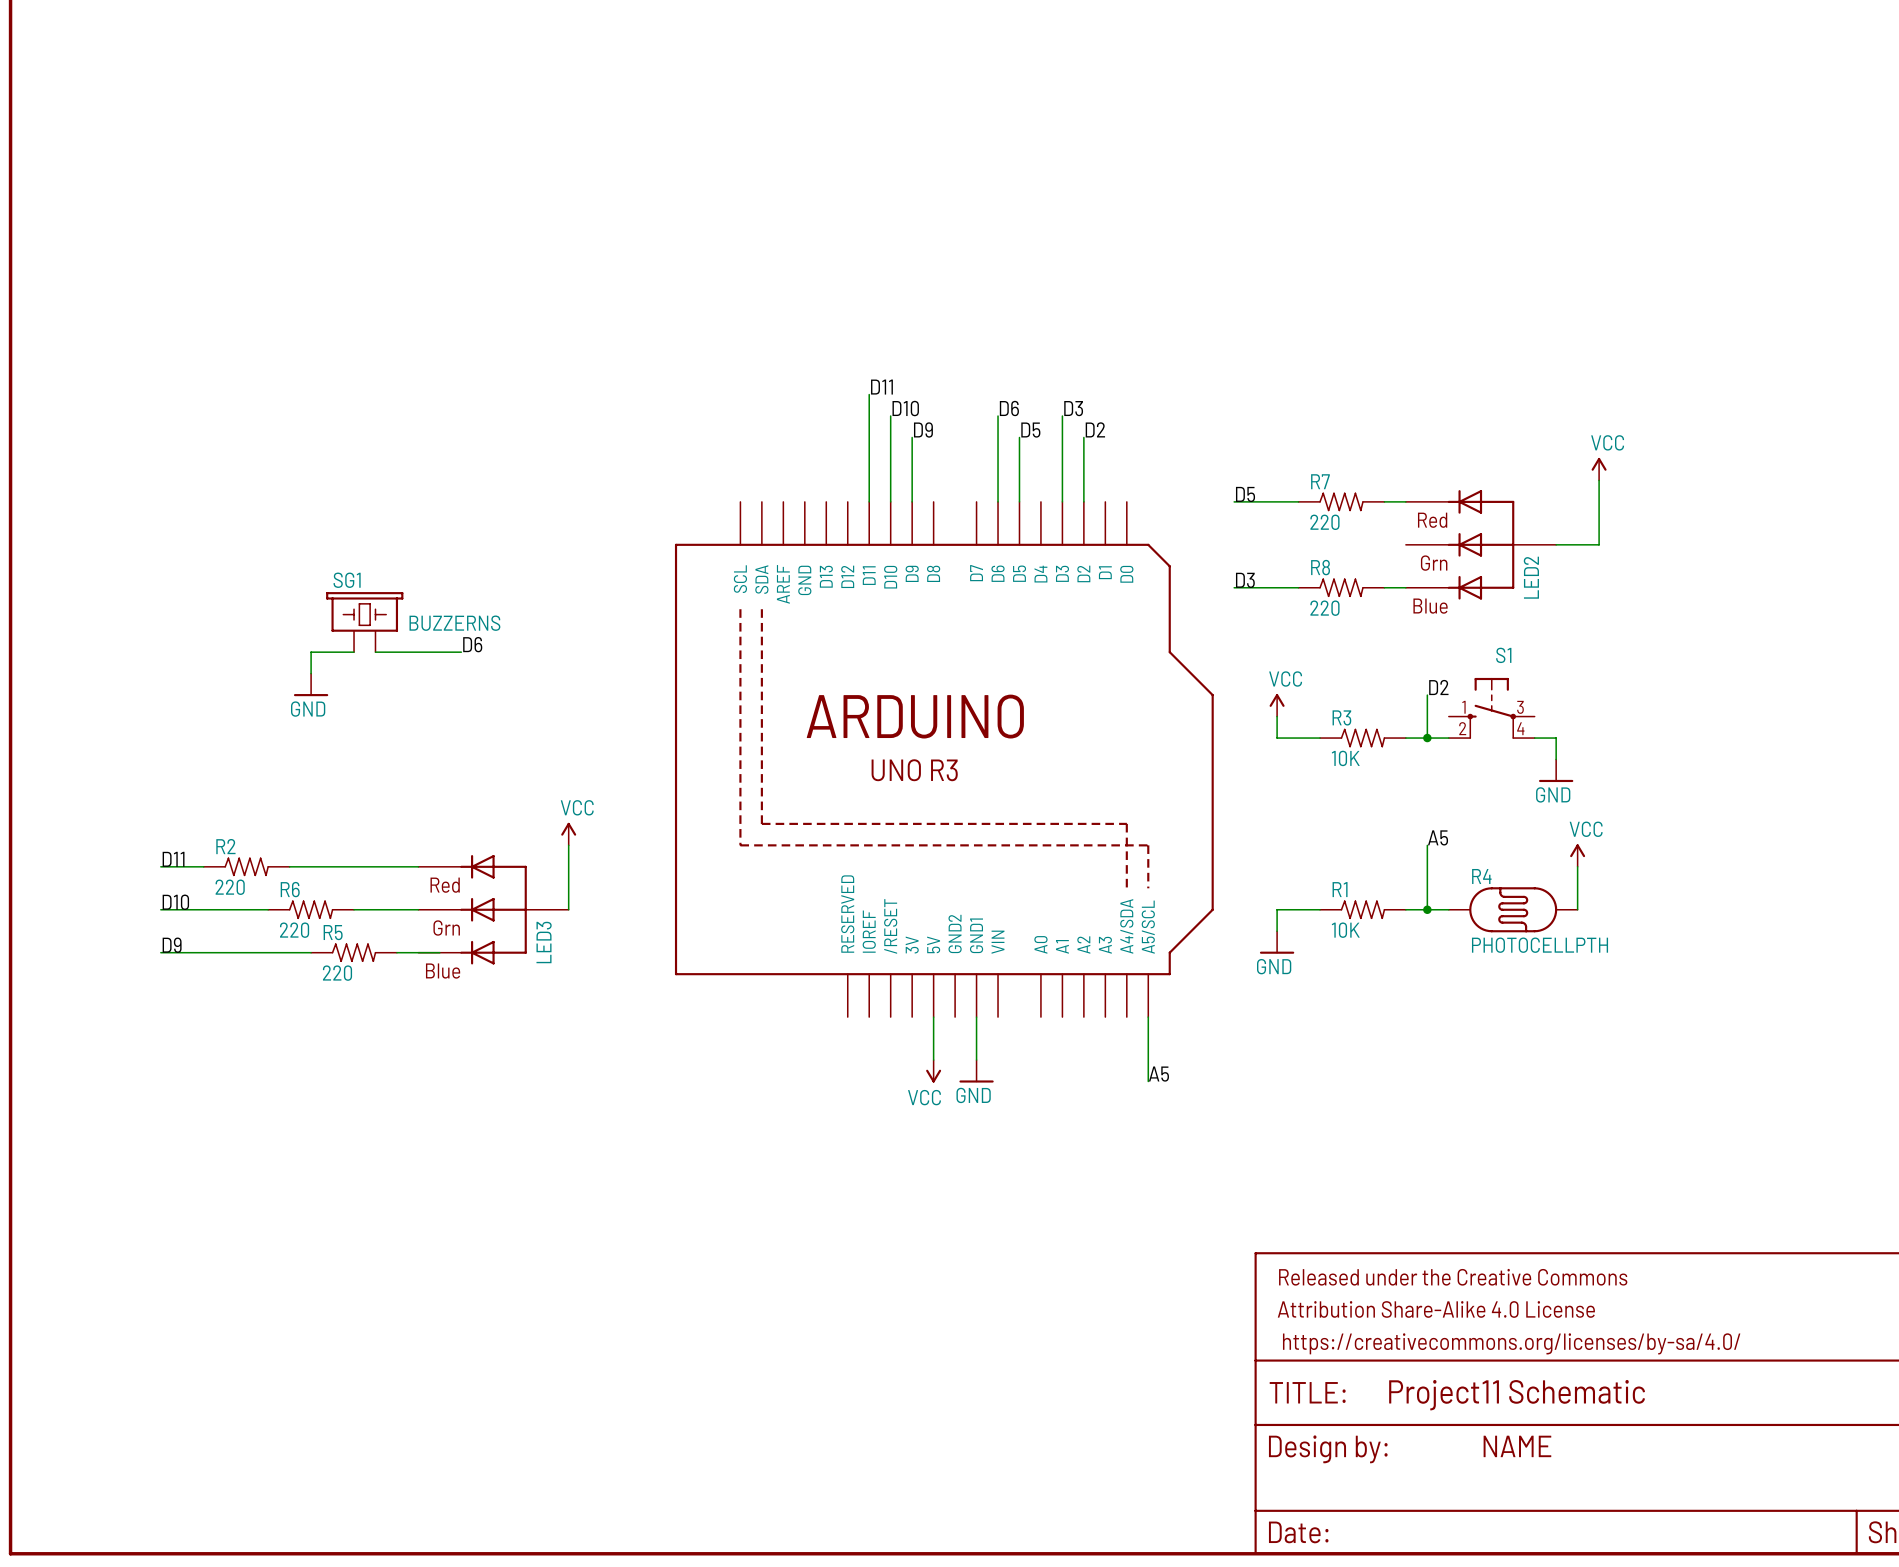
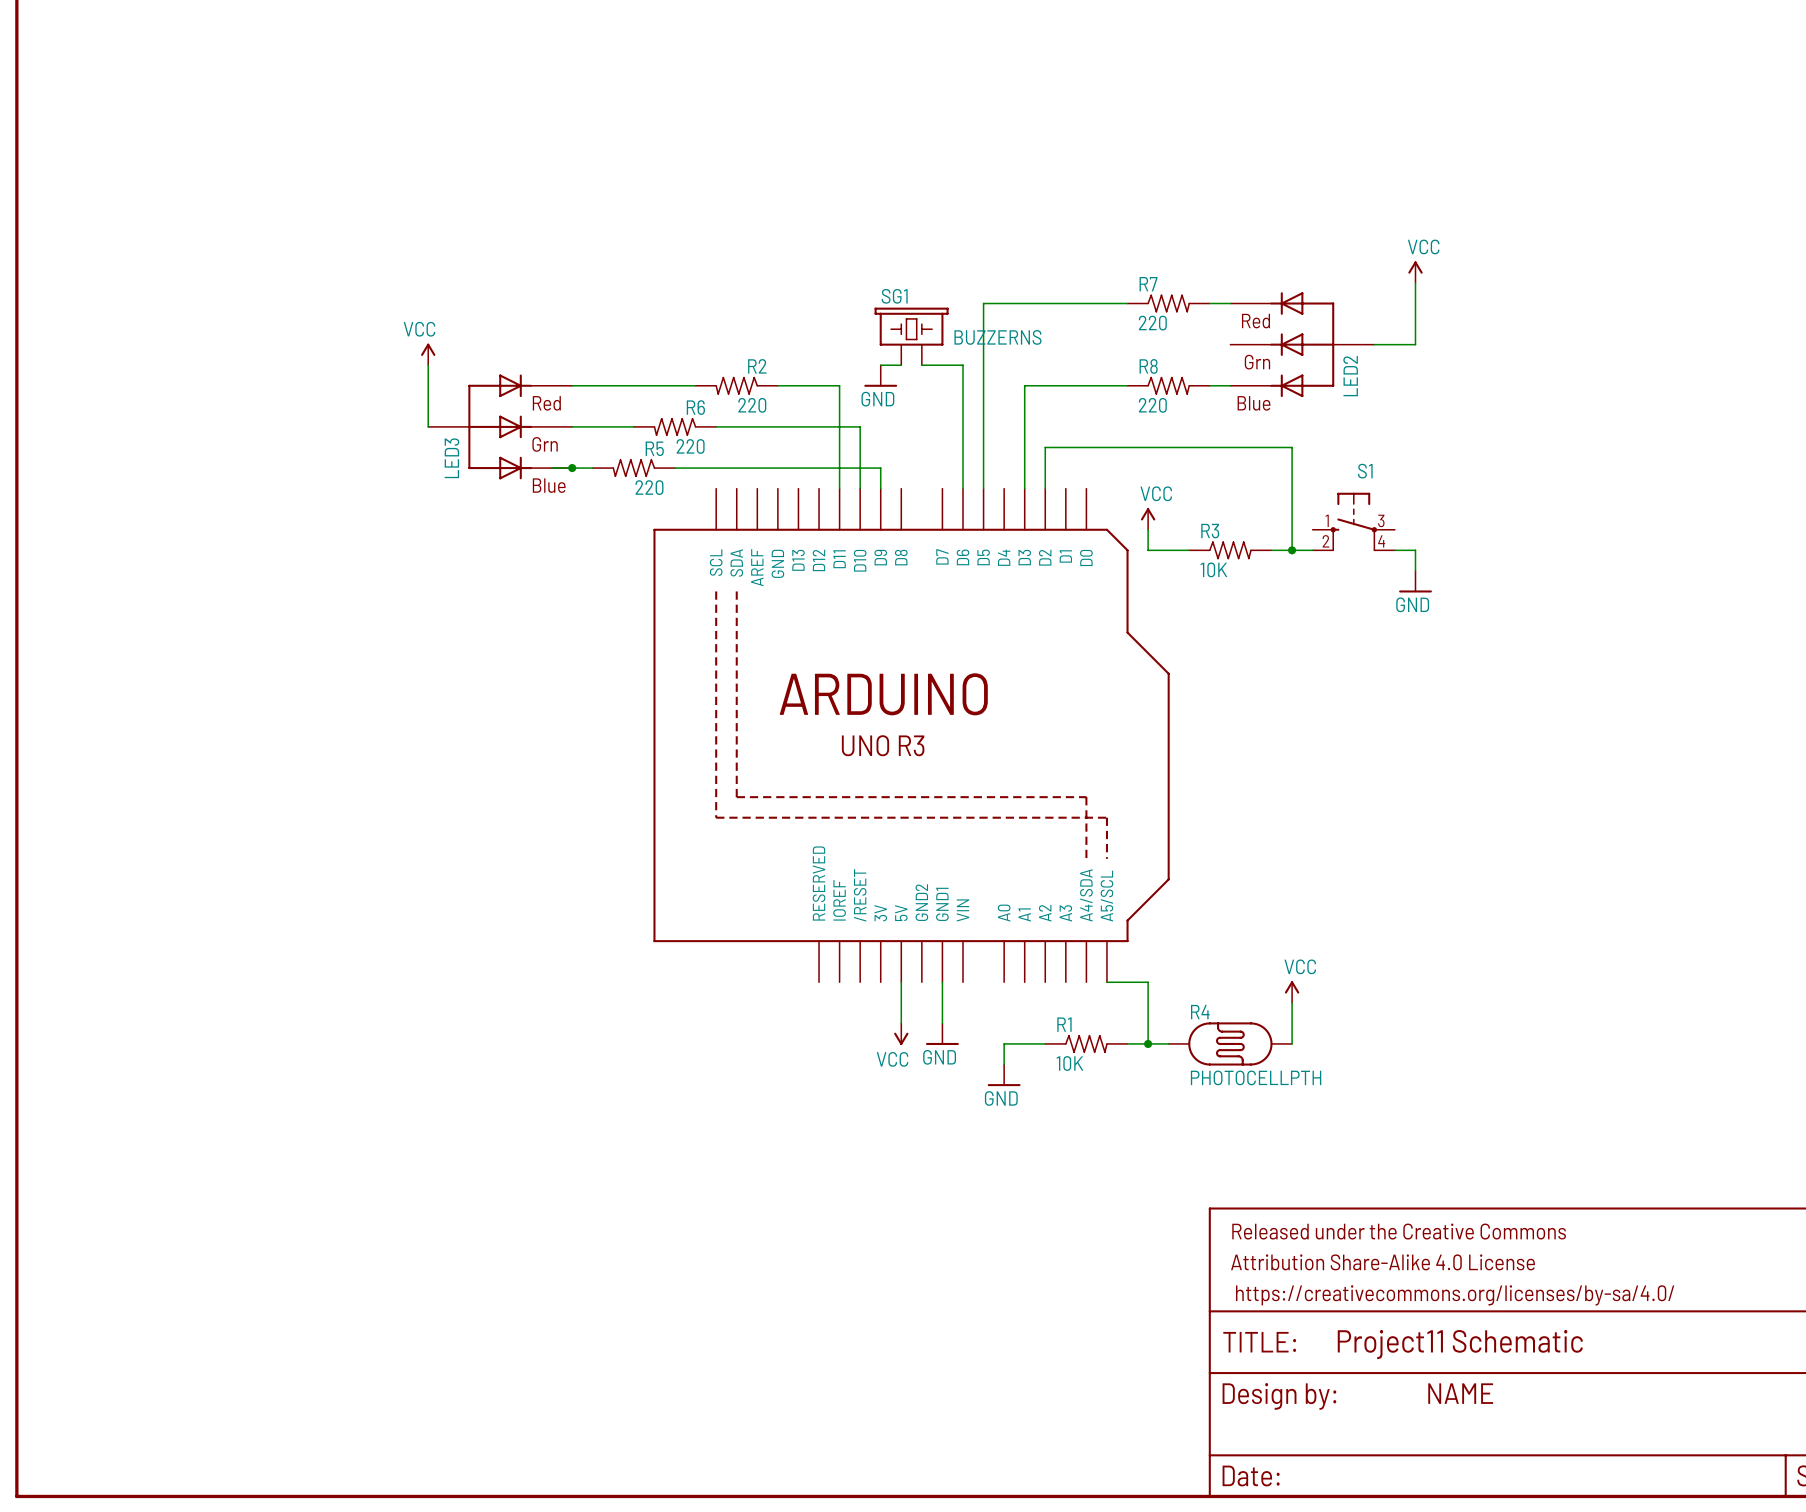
power symbol: none -> VCC (1415, 272)
wire: none -> (1415, 282) (1415, 344) (1374, 344)
wire: none -> (1127, 303) (983, 303) (983, 426)
wire: none -> (1209, 303) (1230, 303)
power symbol: none -> VCC (428, 354)
wire: none -> (428, 365) (428, 426)
wire: none -> (880, 365) (901, 365)
wire: none -> (921, 365) (962, 365) (962, 406)
power symbol: none -> GND (880, 376)
label: D11 (881, 387) -> none
wire: none -> (572, 385) (695, 385)
wire: none -> (777, 385) (839, 385)
wire: none -> (1127, 385) (1024, 385) (1024, 406)
label: D10 (905, 408) -> none
label: D6 (1009, 408) -> none
label: D3 (1073, 408) -> none
wire: (890, 416) (890, 437) -> (716, 426) (860, 426)
label: D9 (923, 429) -> none
label: D2 (1095, 429) -> none
label: D5 (1030, 430) -> none
wire: none -> (572, 426) (633, 426)
wire: (912, 437) (912, 480) -> (675, 468) (880, 468)
wire: (1083, 437) (1083, 458) -> (1292, 550) (1292, 447) (1045, 447)
power symbol: VCC (1599, 469) -> none
wire: none -> (551, 468) (592, 468)
junction: none -> (572, 468)
wire: (1599, 480) (1599, 544) (1556, 544) -> none
label: D5 (1245, 494) -> none
wire: (1234, 501) (1298, 501) -> none
R7 position: (1341, 501) -> (1168, 303)
wire: (1384, 501) (1405, 501) -> (1209, 385) (1230, 385)
power symbol: none -> VCC (1148, 518)
LED2 position: (1481, 544) -> (1302, 344)
junction: none -> (1292, 550)
label: D3 (1245, 580) -> none
wire: (1234, 587) (1298, 587) -> none
R8 position: (1341, 587) -> (1168, 385)
wire: (1384, 587) (1405, 587) -> none
SG1 position: (364, 622) -> (911, 336)
label: D6 (472, 644) -> none
wire: (354, 652) (311, 652) (311, 673) -> none
wire: (375, 652) (461, 652) -> none
power symbol: GND (311, 684) -> none
label: D2 (1438, 687) -> none
wire: (1427, 695) (1427, 738) -> none
power symbol: VCC (1277, 705) -> none
S1 position: (1491, 708) -> (1353, 521)
wire: (1277, 716) (1277, 738) (1320, 738) -> (1148, 529) (1148, 550) (1189, 550)
R3 position: (1362, 738) -> (1230, 550)
wire: (1405, 738) (1448, 738) -> (1271, 550) (1312, 550)
junction: (1427, 738) -> none
wire: (1534, 738) (1556, 738) (1556, 759) -> (1394, 550) (1415, 550) (1415, 570)
power symbol position: GND (1556, 770) -> GND (1415, 581)
power symbol: VCC (568, 834) -> none
label: A5 (1438, 837) -> none
wire: (568, 845) (568, 909) -> none
wire: (1427, 845) (1427, 909) -> none
power symbol: VCC (1577, 855) -> none
label: D11 (173, 859) -> none
wire: (160, 866) (203, 866) -> none
R2 flip: as is (246, 866) -> left-right (736, 385)
R2 position: (246, 866) -> (736, 385)
wire: (289, 866) (418, 866) -> none
wire: (1577, 866) (1577, 909) -> none
label: D10 (175, 902) -> none
wire: (160, 909) (268, 909) -> none
R6 flip: as is (311, 909) -> left-right (675, 426)
R6 position: (311, 909) -> (675, 426)
wire: (354, 909) (418, 909) -> none
LED3 flip: as is (493, 909) -> left-right (500, 426)
LED3 position: (493, 909) -> (500, 426)
wire: (1320, 909) (1277, 909) (1277, 931) -> none
R1 position: (1362, 909) -> (1086, 1043)
wire: (1405, 909) (1448, 909) -> none
junction: (1427, 909) -> none
R4 position: (1513, 909) -> (1230, 1043)
power symbol: GND (1277, 942) -> none
label: D9 (172, 945) -> none
wire: (160, 952) (311, 952) -> none
R5 flip: as is (354, 952) -> left-right (633, 468)
R5 position: (354, 952) -> (633, 468)
wire: (396, 952) (439, 952) -> none
wire: (1148, 1017) (1148, 1081) -> (1106, 982) (1148, 982) (1148, 1043)
power symbol: none -> VCC (1292, 992)
wire: none -> (1292, 1002) (1292, 1043)
label: A5 (1158, 1074) -> none
wire: none -> (1045, 1043) (1004, 1043) (1004, 1064)
wire: none -> (1127, 1043) (1168, 1043)
junction: none -> (1148, 1043)
power symbol: none -> GND (1004, 1075)

